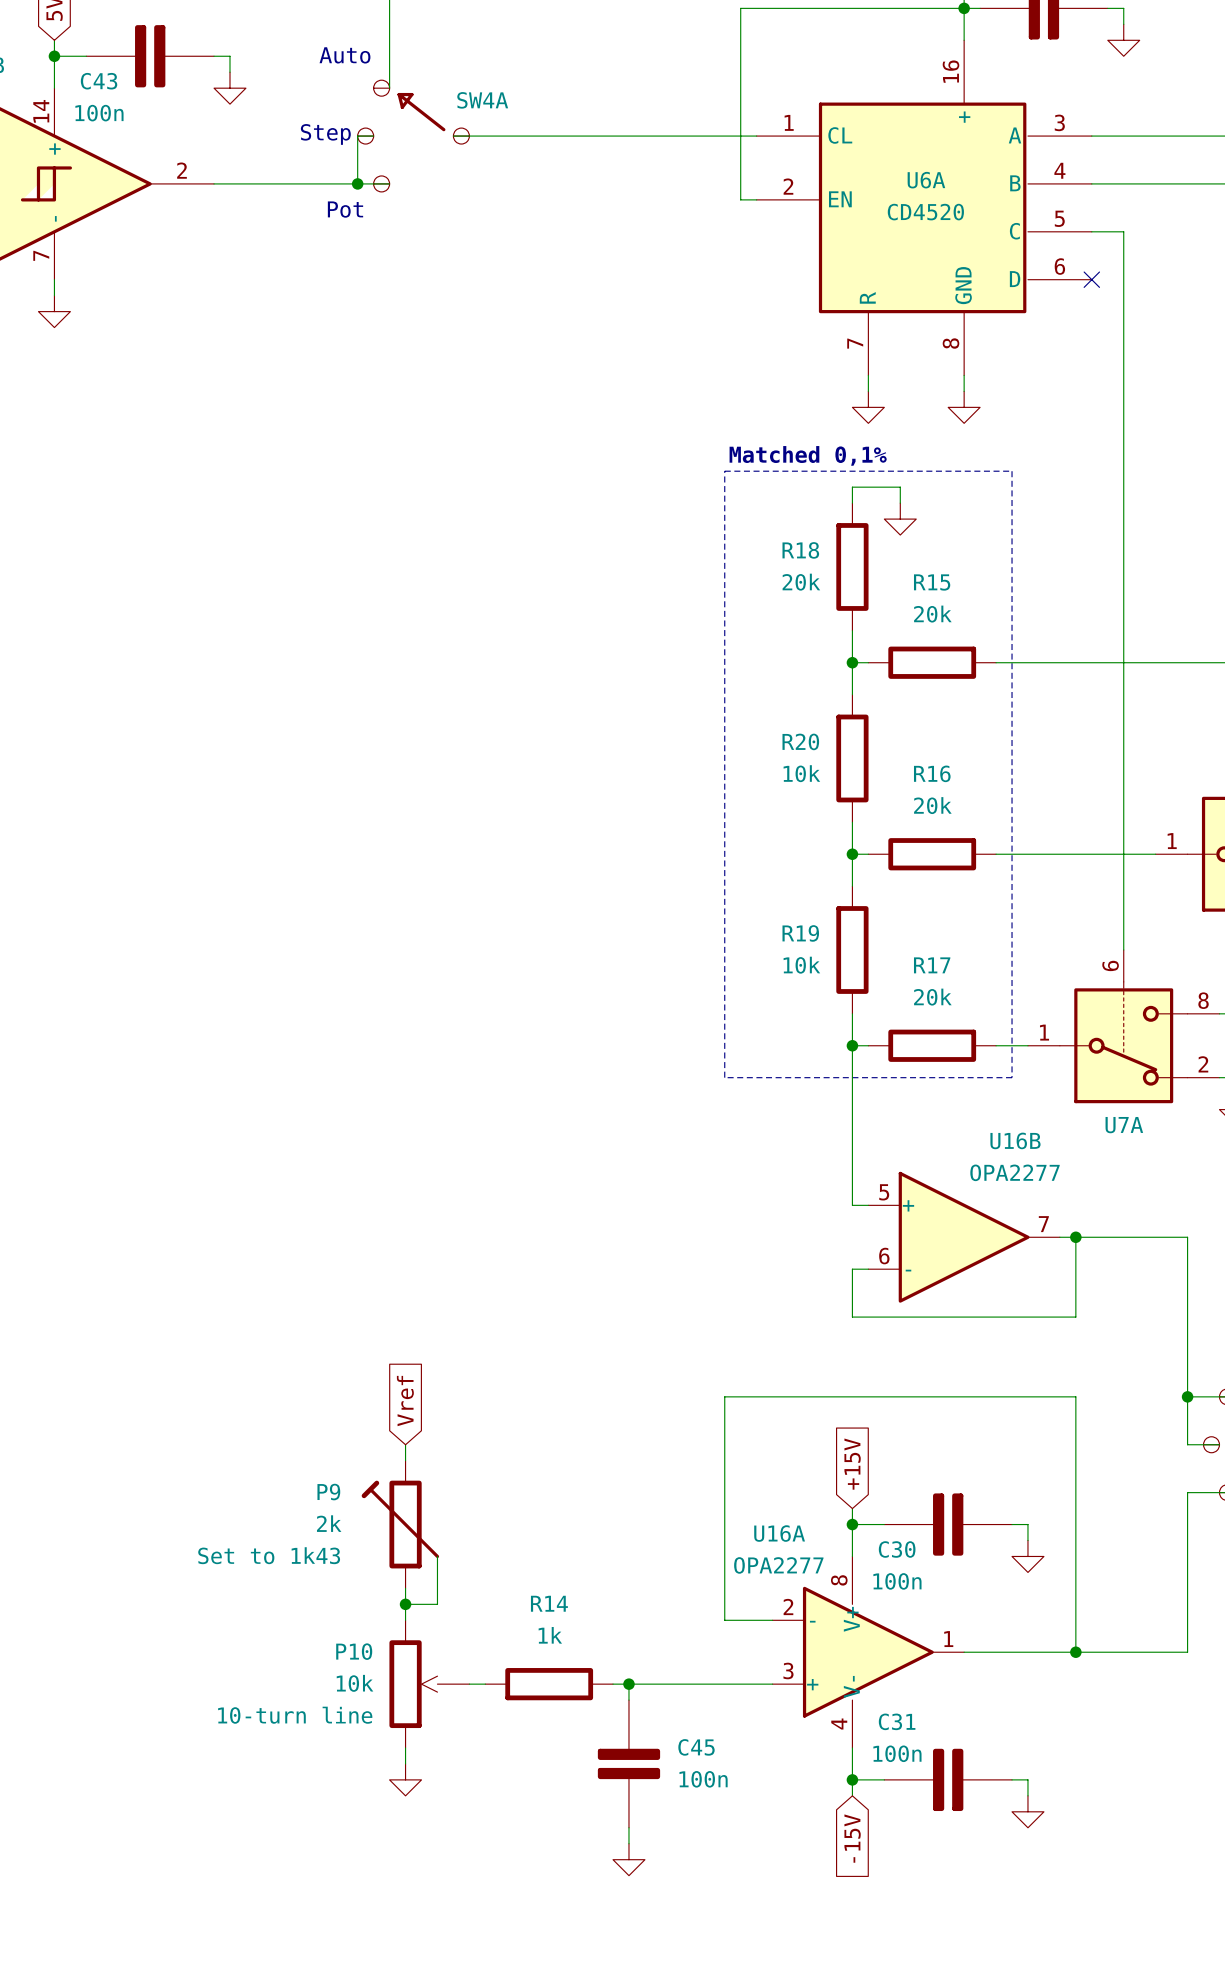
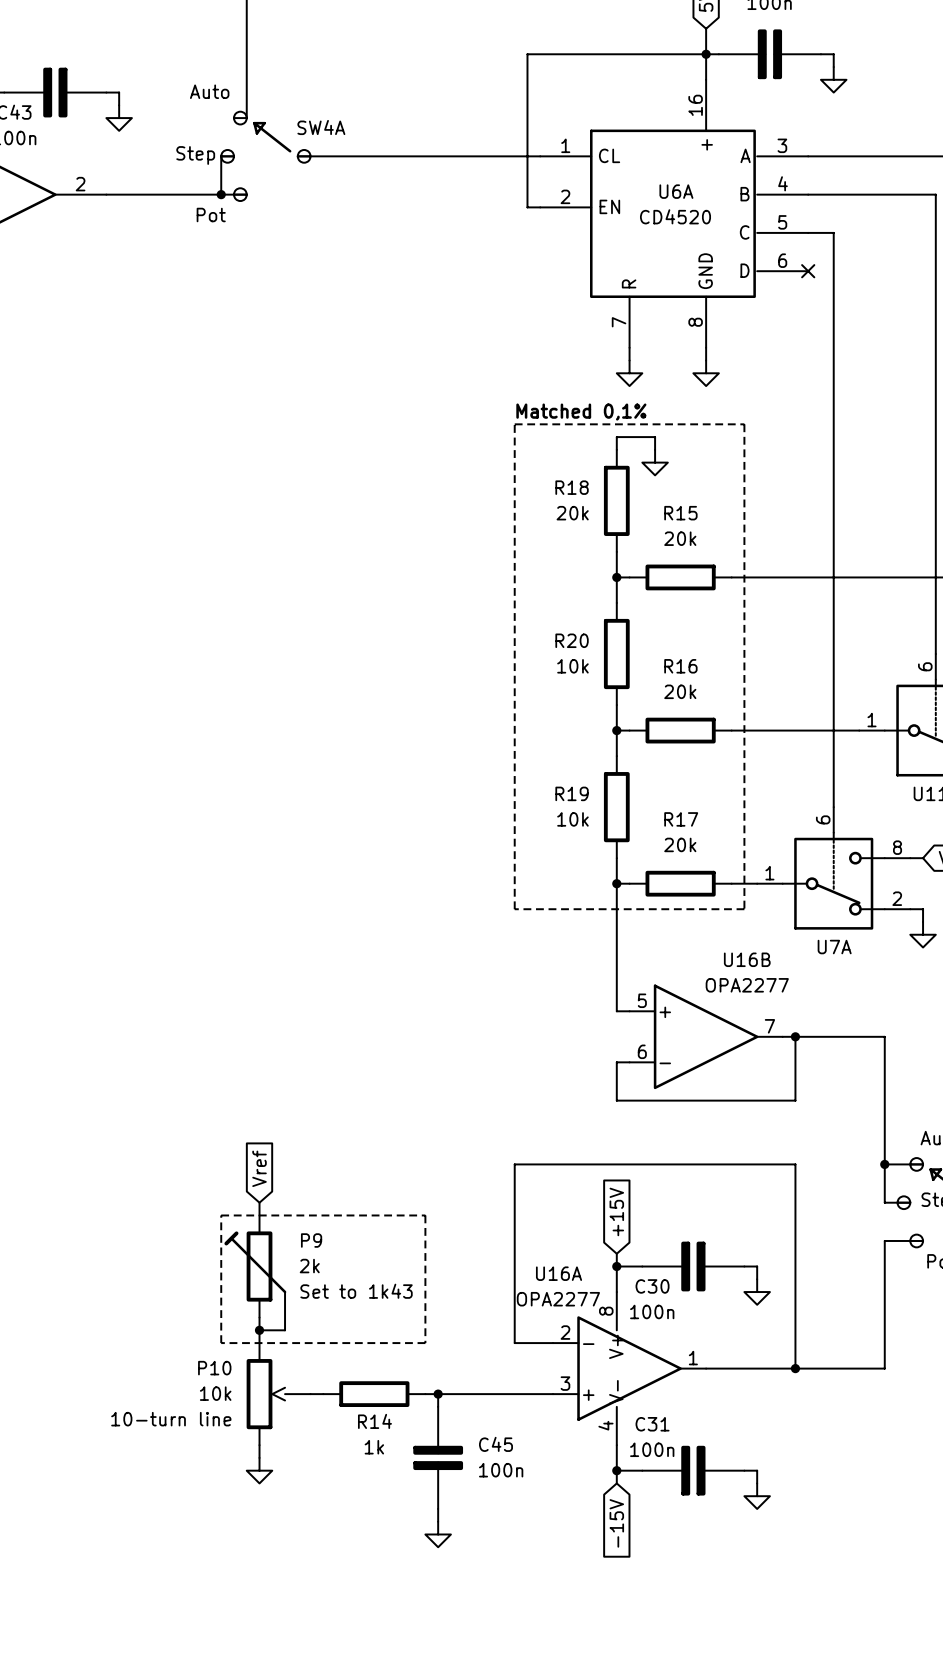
line: none -> (221, 1215) (425, 1215) (425, 1343) (221, 1343) (221, 1215)
P9 name position: P9 (328, 1492) -> P9 (311, 1240)
P9 value position: 2k (329, 1523) -> 2k (309, 1266)
P9 text position: Set to 1k43 (269, 1555) -> Set to 1k43 (356, 1291)
R14 name position: R14 (549, 1603) -> R14 (374, 1421)
R14 value position: 1k (550, 1635) -> 1k (374, 1447)

